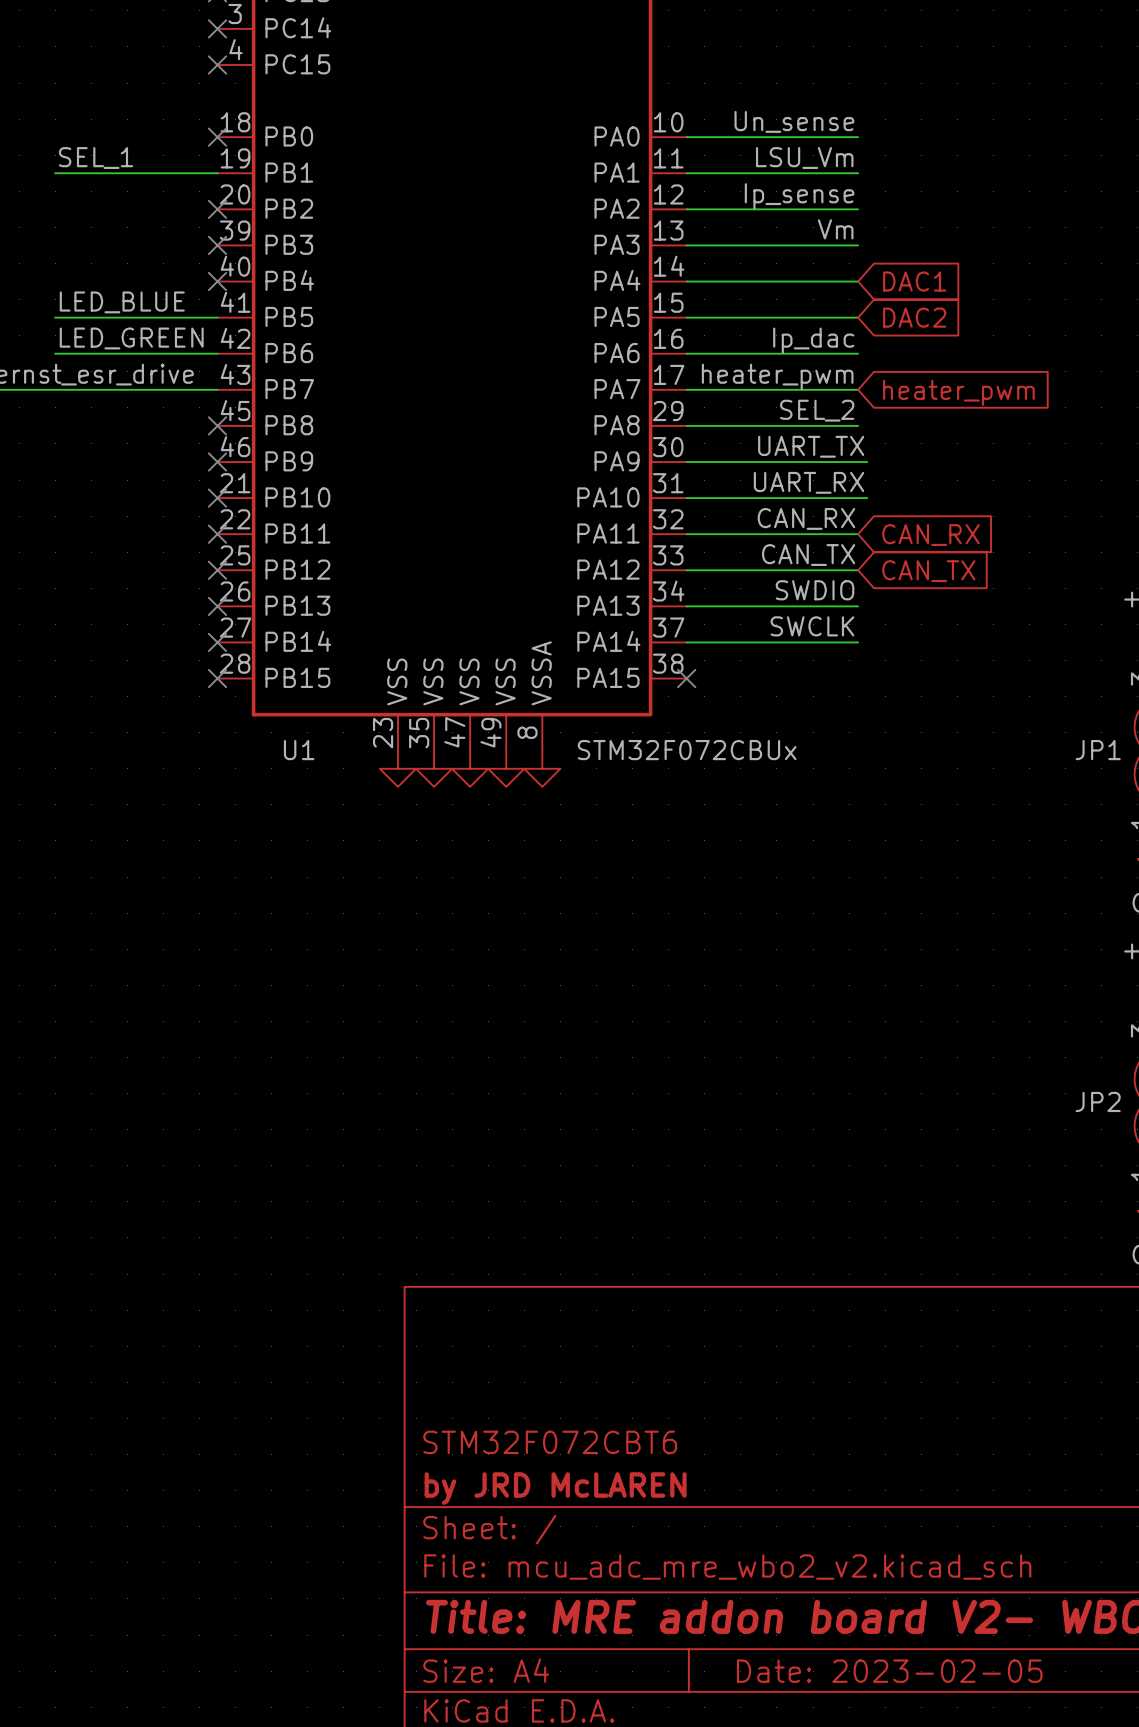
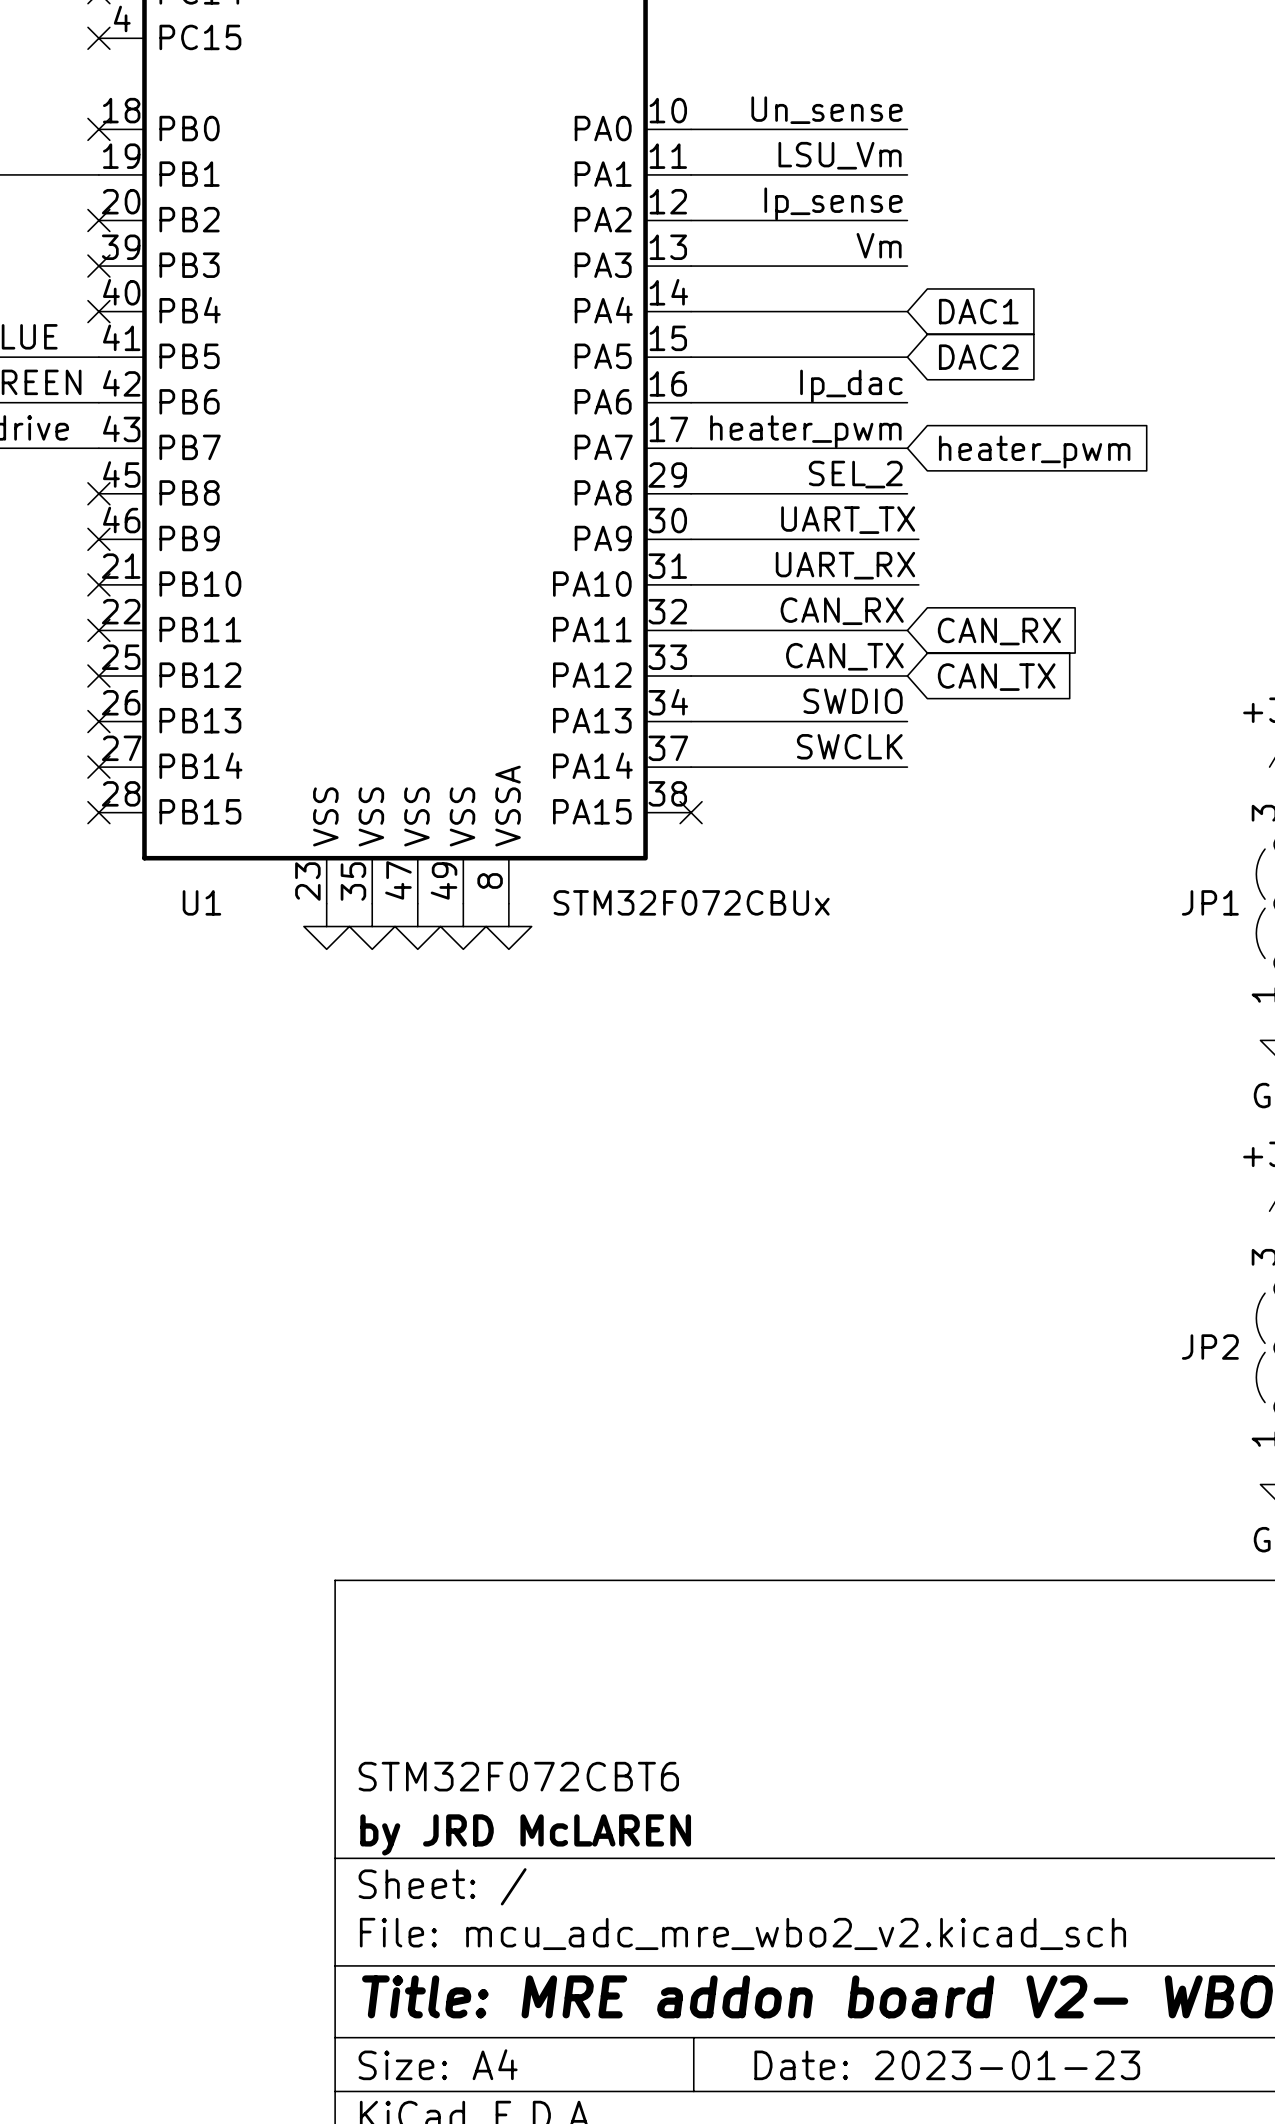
title block: Date: 2023-02-05 (889, 1671) -> Date: 2023-01-23 (947, 2065)

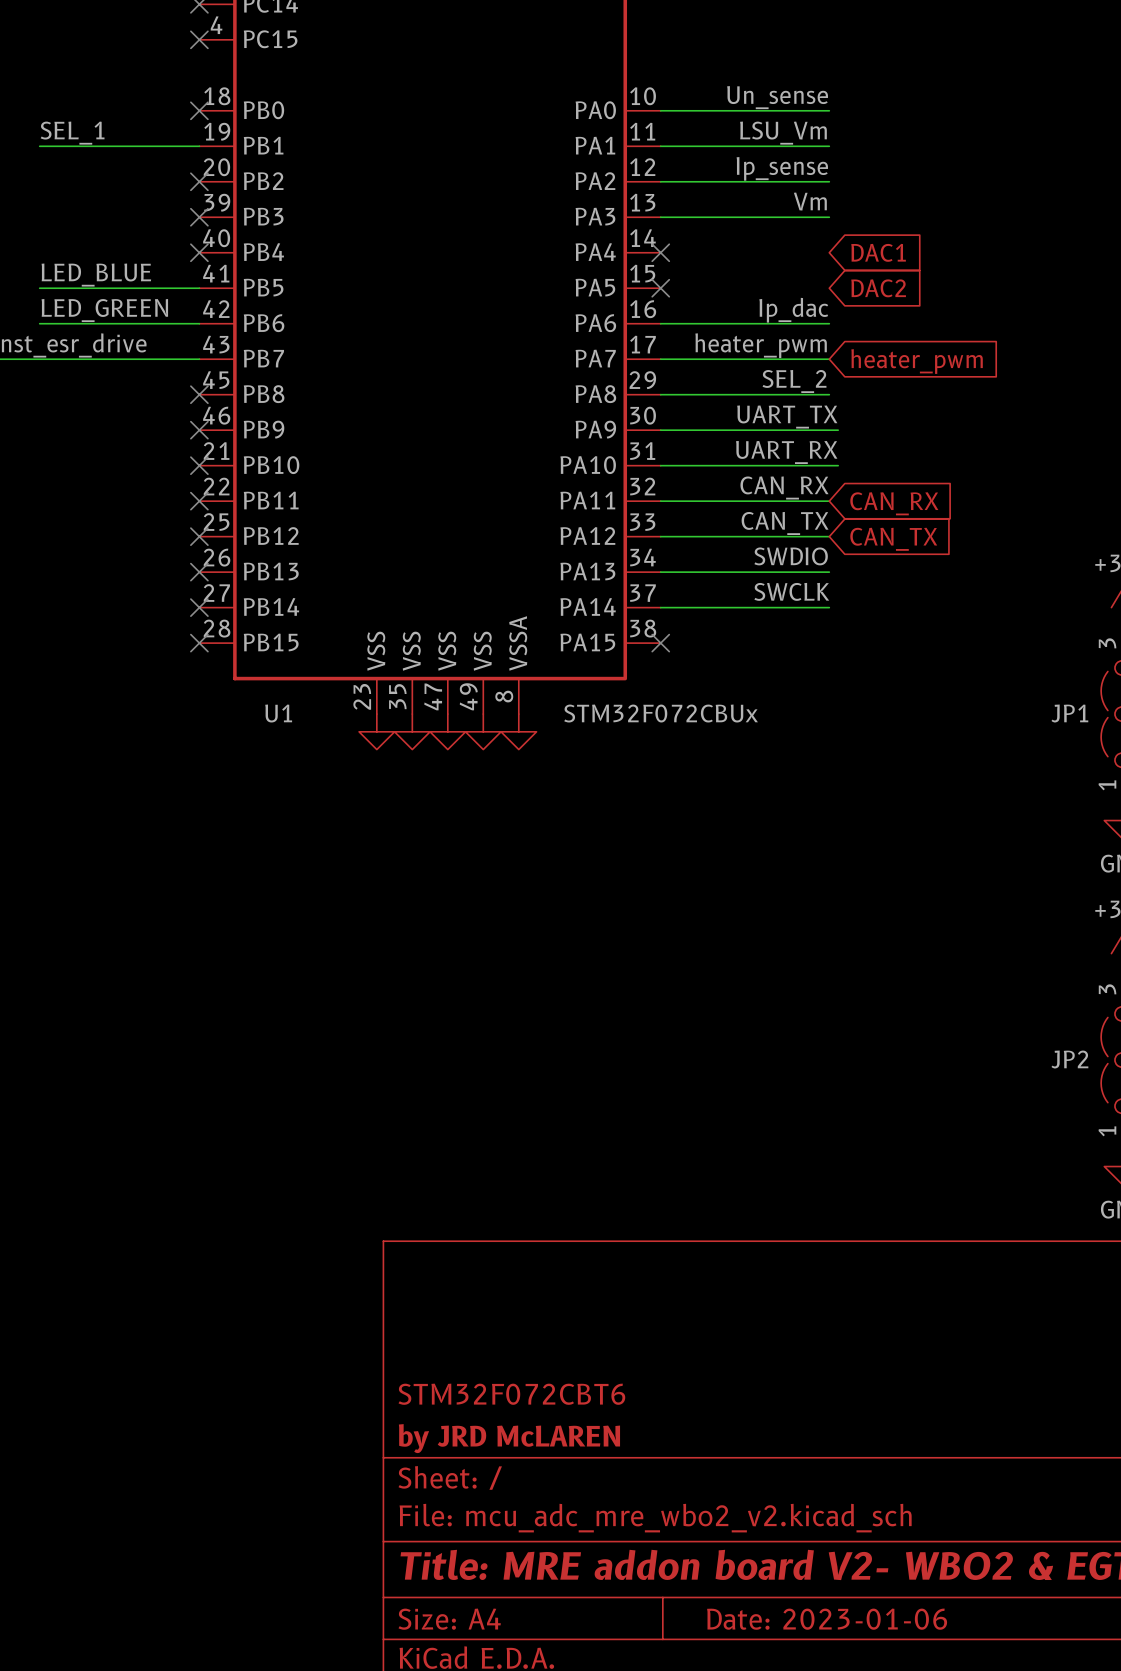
wire: (691, 311) (907, 311) -> none
no-connect mark: none -> (660, 252)
wire: (691, 357) (907, 357) -> none
no-connect mark: none -> (660, 288)
title block: Date: 2023-01-23 (947, 2065) -> Date: 2023-01-06 (827, 1619)

